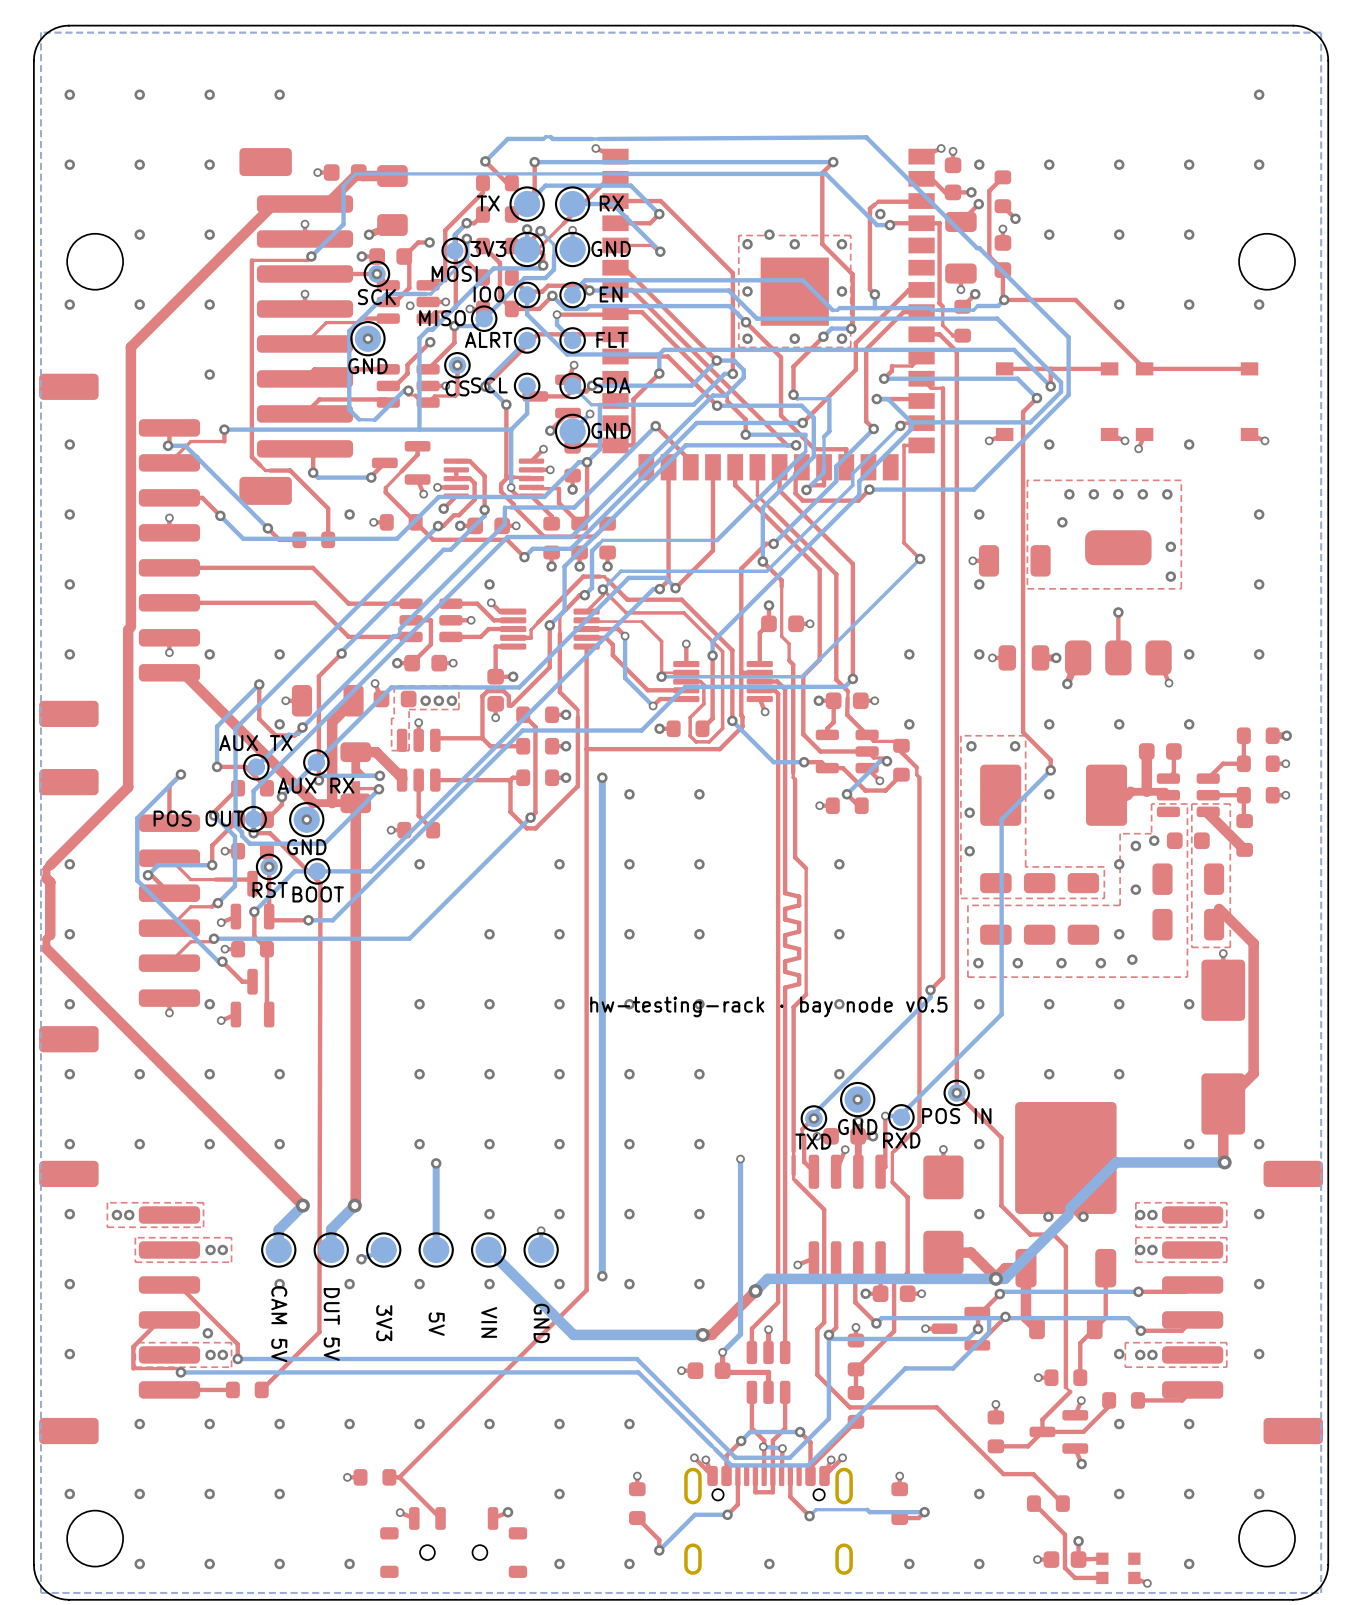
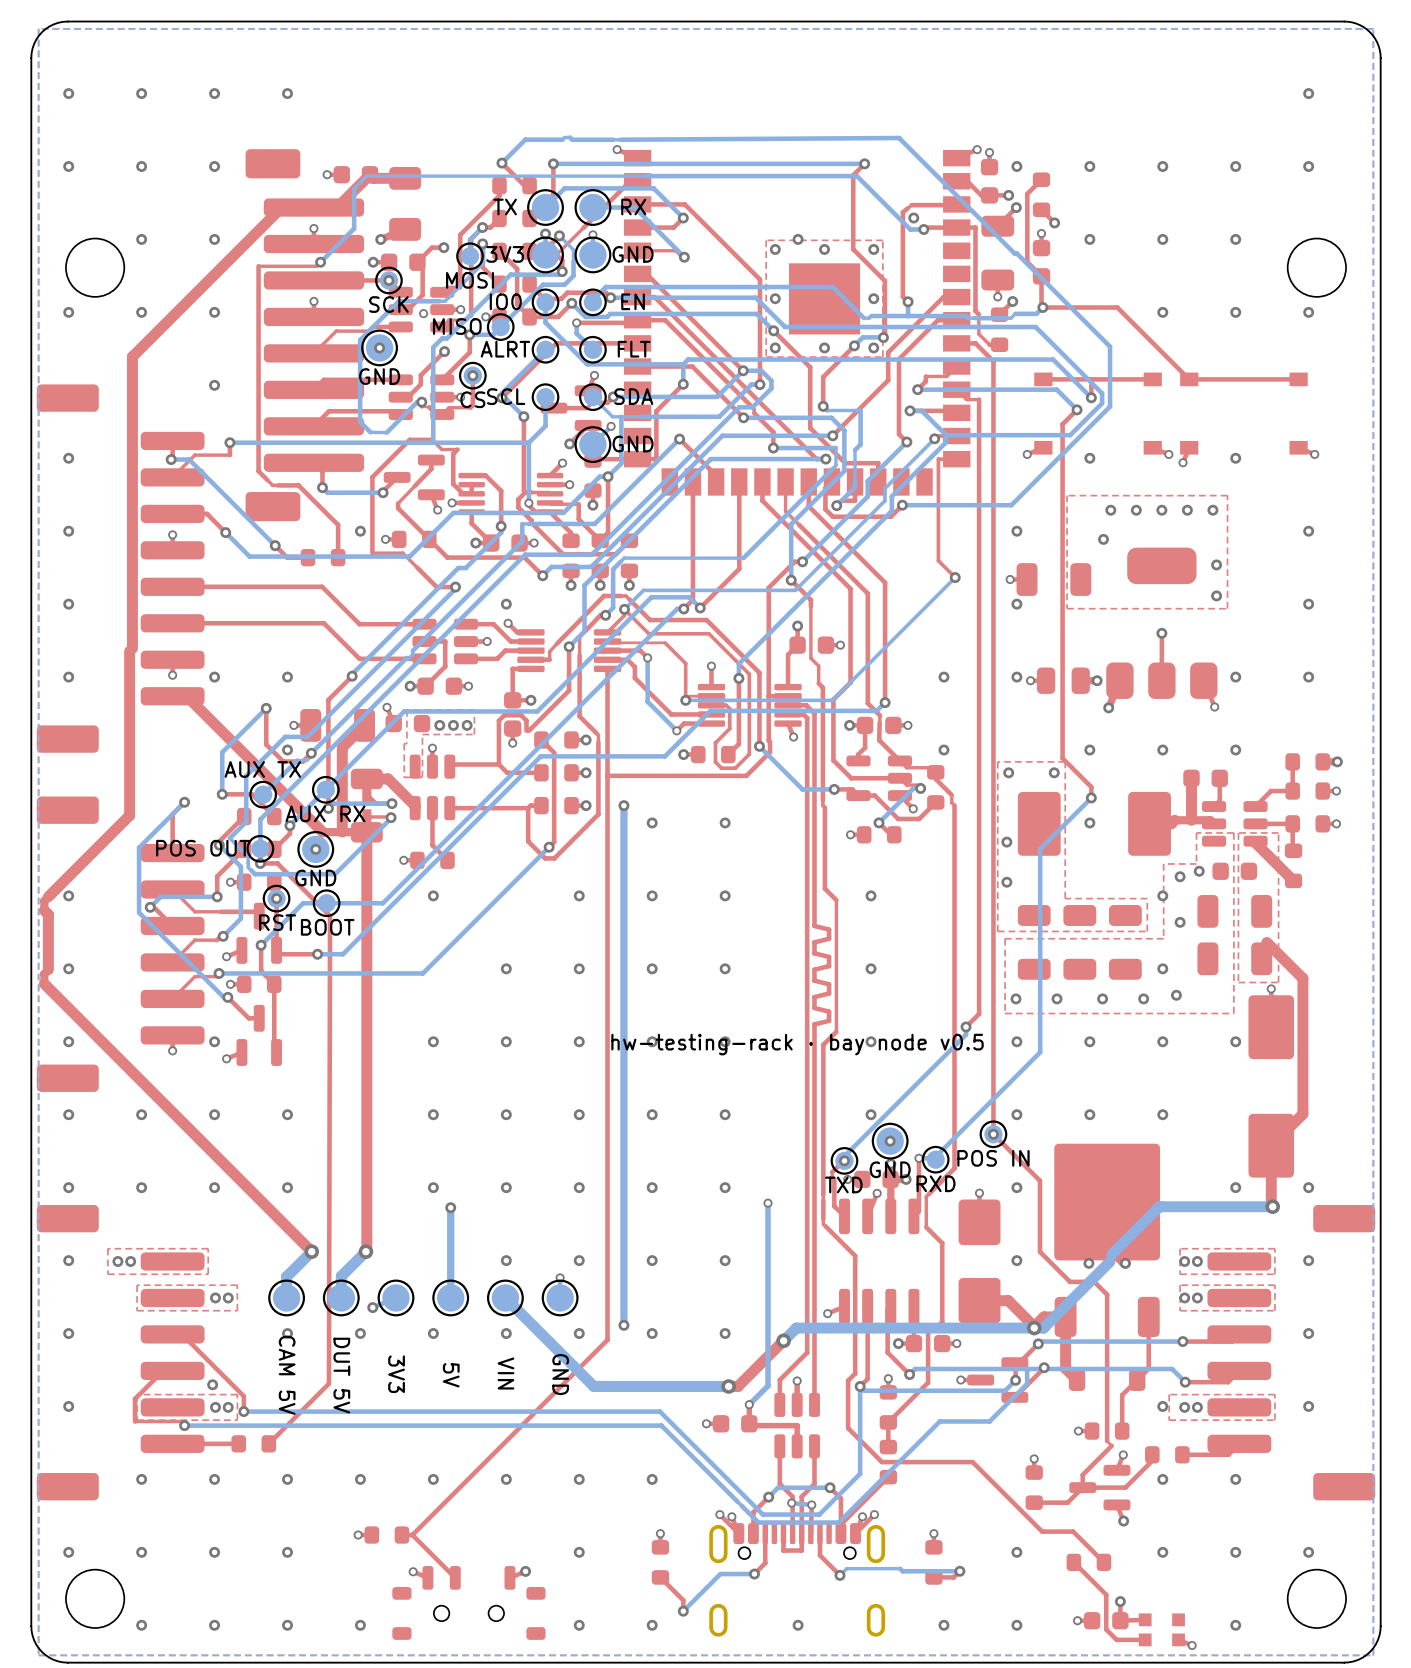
top track: (456, 478) (470, 478) (474, 483) (474, 499) (459, 515) (453, 515) (443, 526) (438, 526) -> (471, 493) (462, 493) (453, 484) (453, 453) (457, 449) (441, 449) (432, 439) (409, 439) (372, 477) (372, 553) (402, 553) (436, 587) (455, 587)
top track: (456, 496) (443, 508) -> (471, 512) (471, 523) (491, 543)
via: (443, 508) -> none
bottom track: (438, 526) (235, 728) (235, 825) (249, 843) (324, 843) (378, 789) -> (455, 588) (307, 736) (285, 736) (246, 775) (246, 821) (229, 838) (248, 856) (248, 867) (254, 874) (335, 874) (391, 817)
via: (438, 526) -> none
via: none -> (455, 587)

